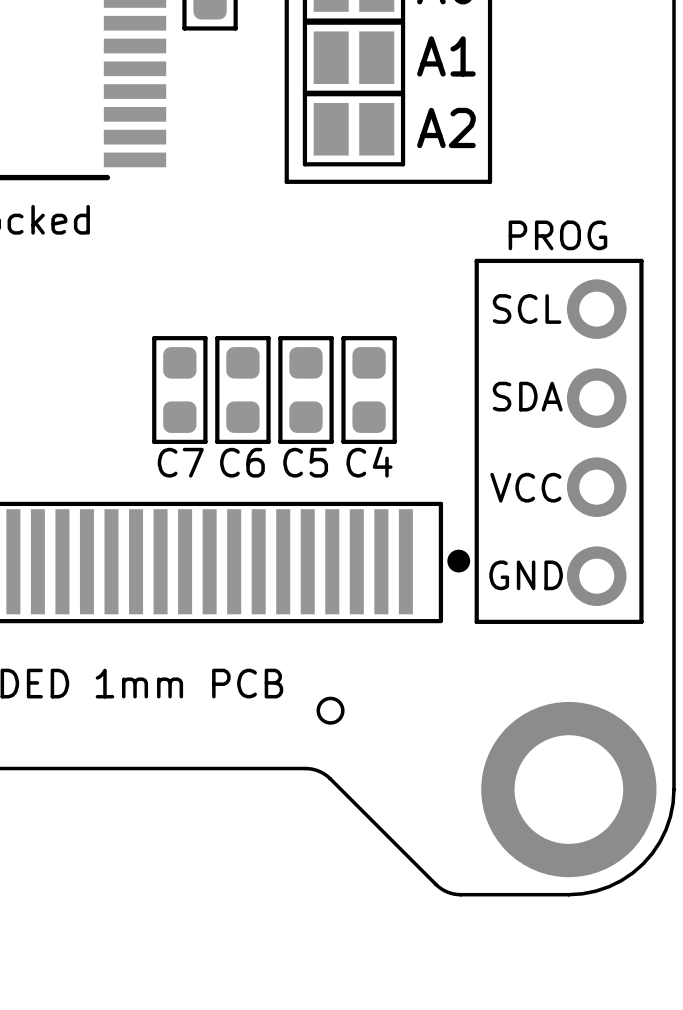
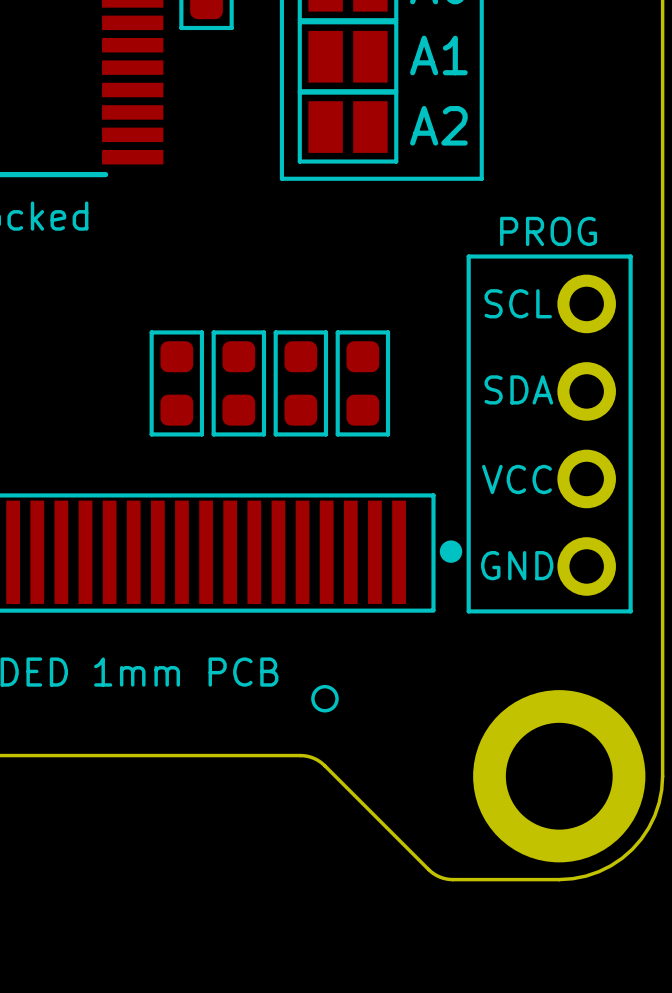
C7 name: C7 (180, 462) -> none
C6 name: C6 (242, 462) -> none
C5 name: C5 (305, 462) -> none
C4 name: C4 (369, 462) -> none

